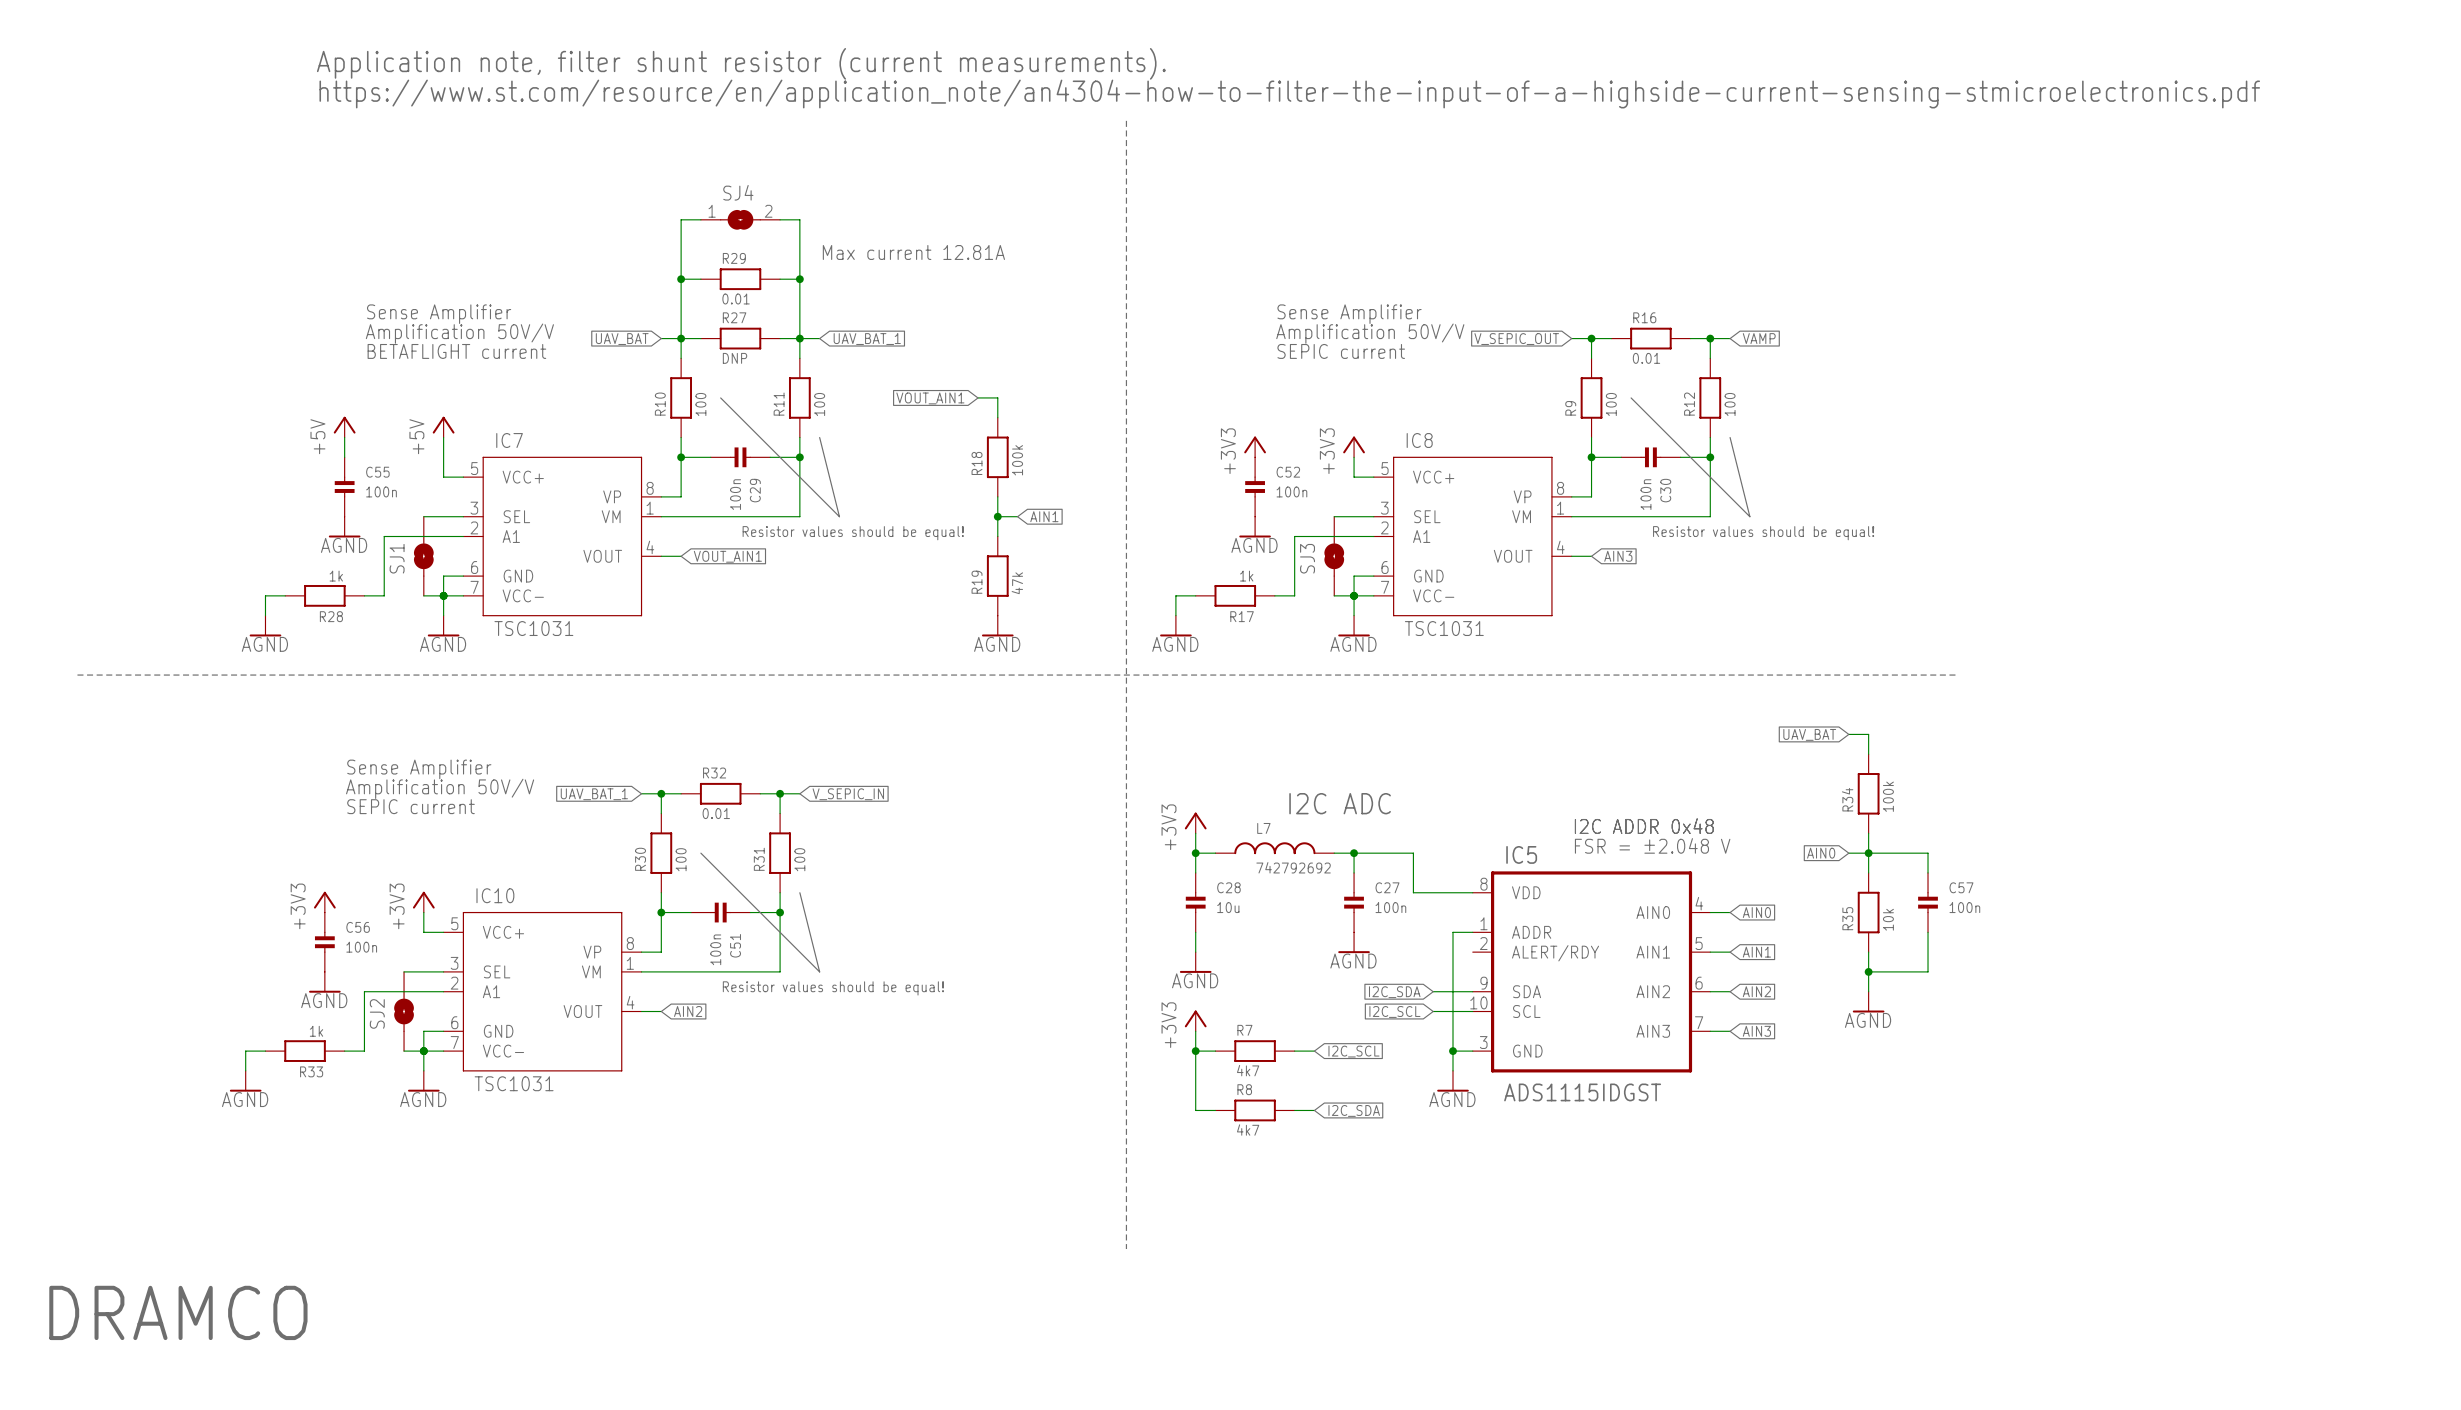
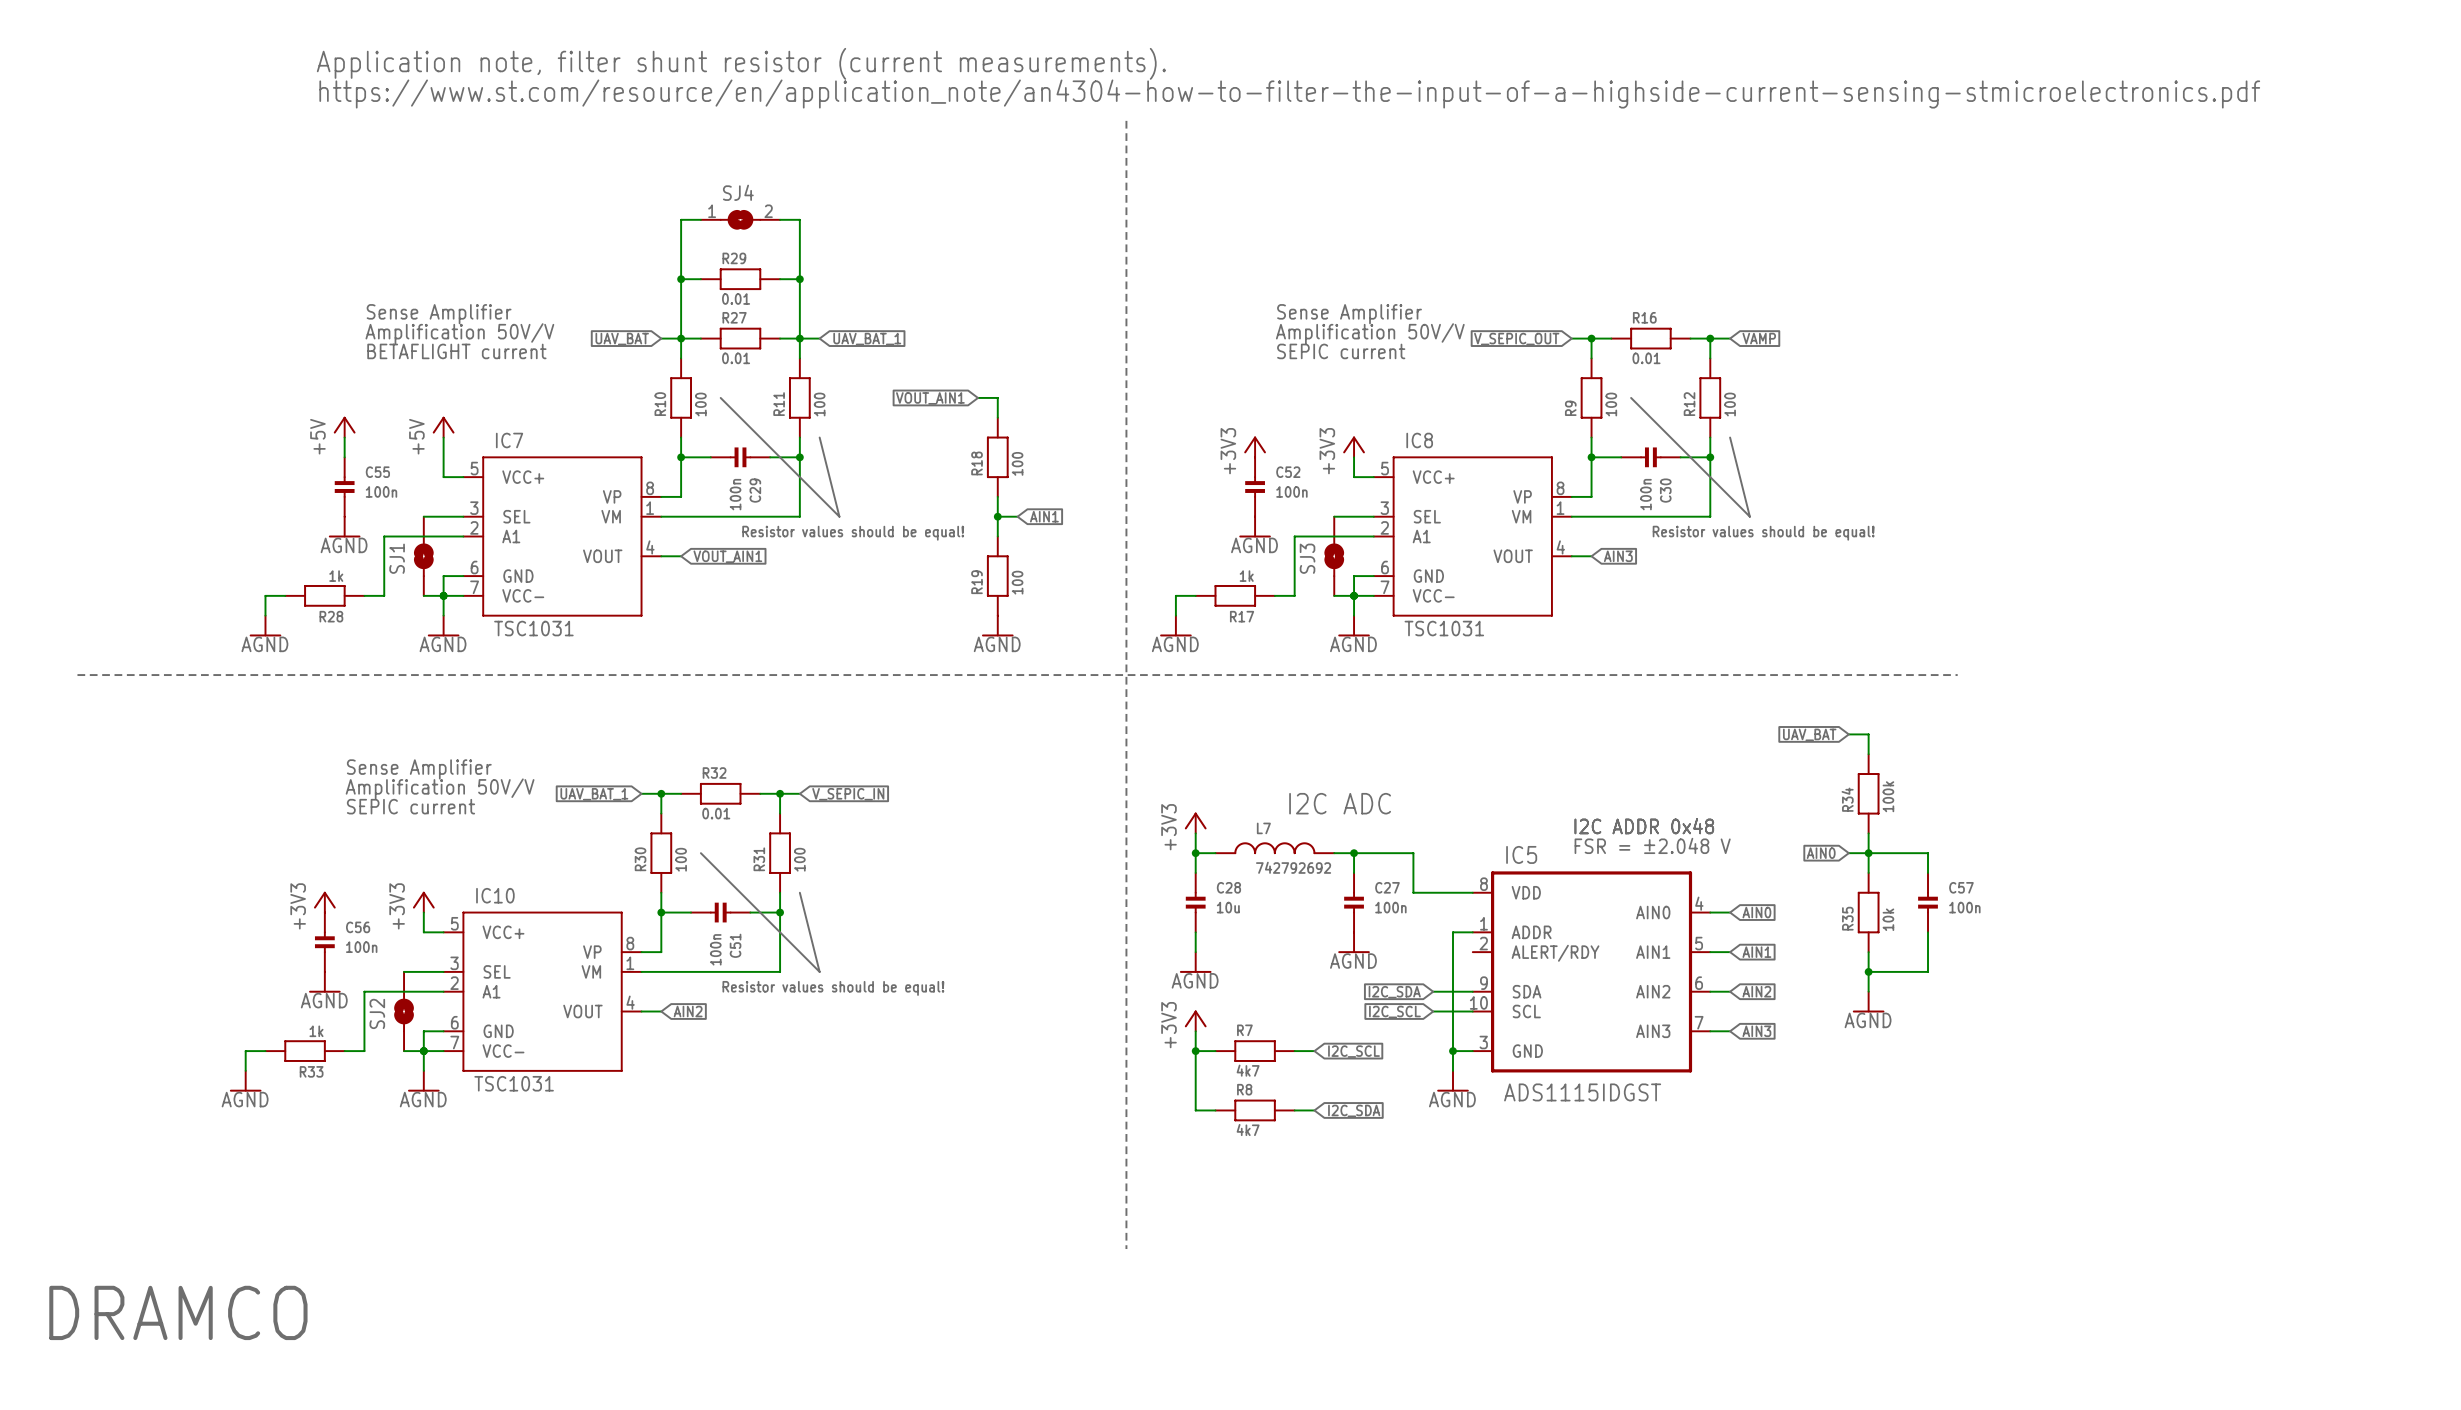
text: Max current 12.81A (913, 252) -> none
R27 value: DNP (735, 358) -> 0.01 (736, 358)
R18 value: 100k (1017, 460) -> 100 (1017, 463)
R19 value: 47k (1017, 583) -> 100 (1017, 582)

